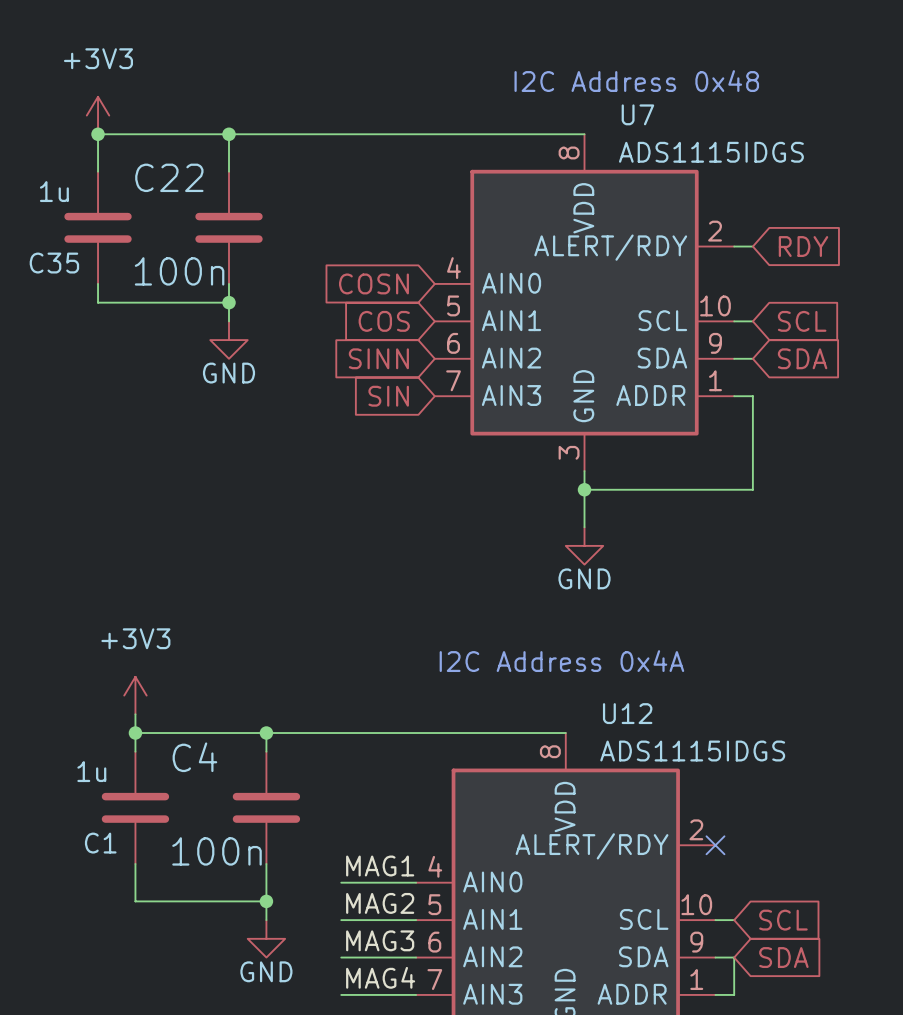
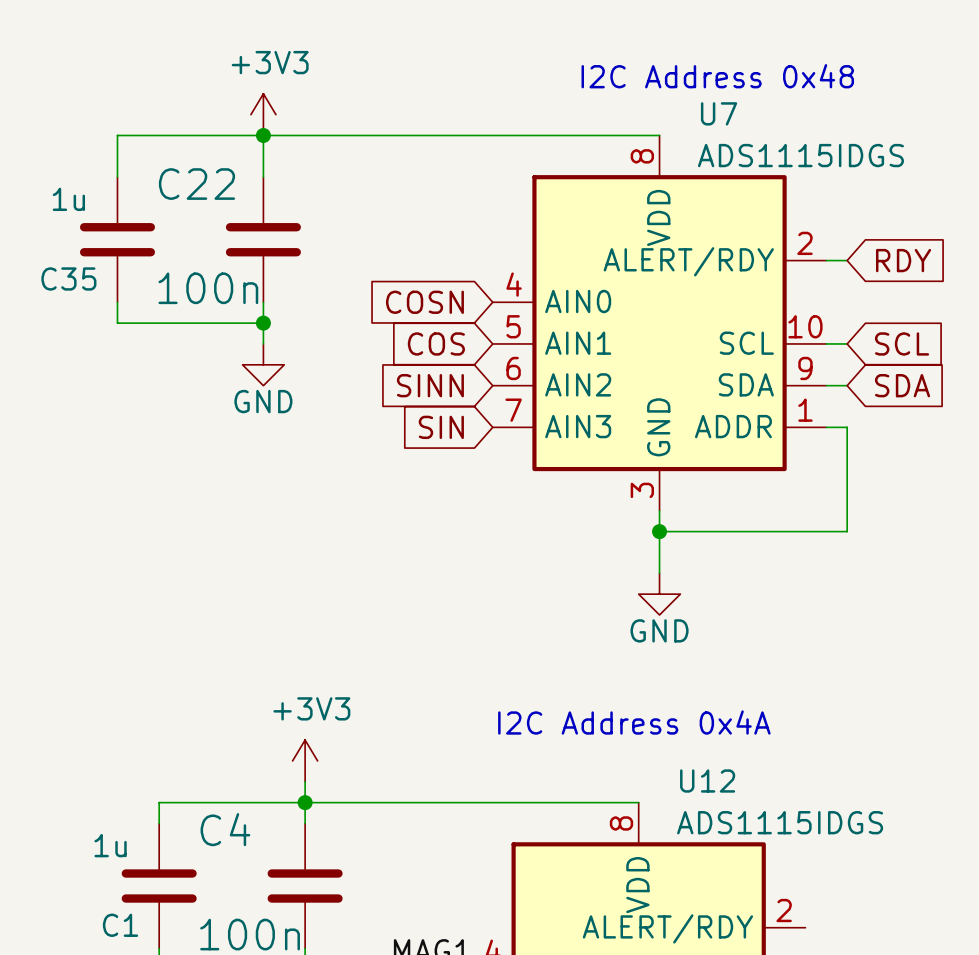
power symbol text position: +3V3 (98, 58) -> +3V3 (270, 62)
power symbol position: +3V3 (98, 115) -> +3V3 (263, 114)
junction: (98, 134) -> none
power symbol text position: +3V3 (135, 638) -> +3V3 (311, 708)
power symbol position: +3V3 (135, 695) -> +3V3 (305, 760)
wire: (135, 714) (135, 733) -> (305, 781) (305, 802)
junction: (135, 733) -> none
no-connect mark: (715, 845) -> none

